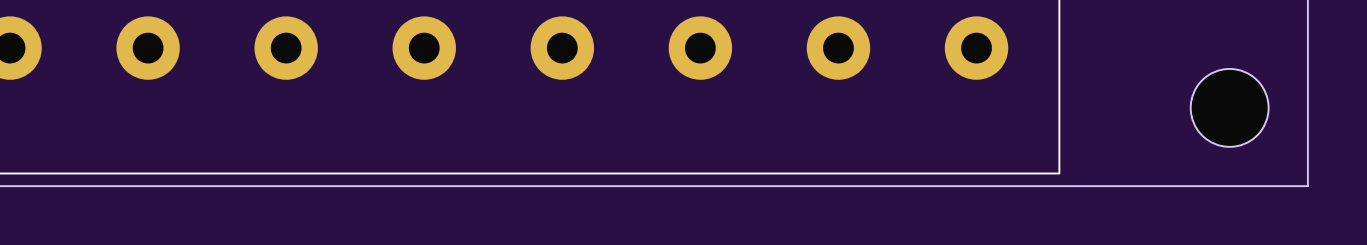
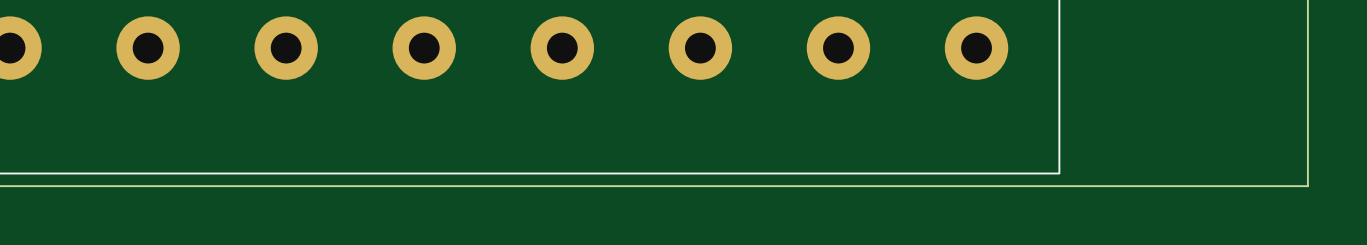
part: (1229, 107) -> none

